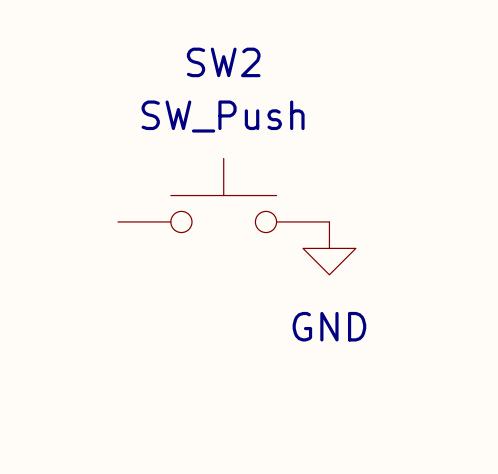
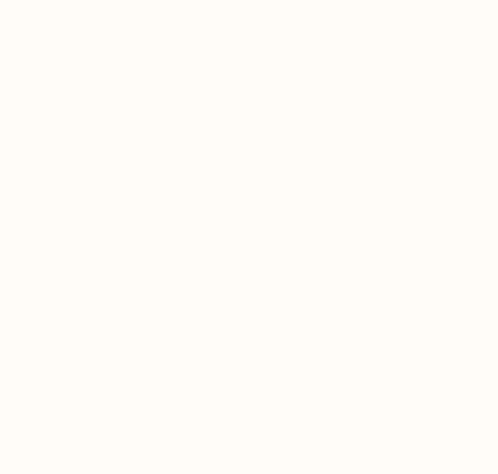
SW2: SW_Push (223, 195) -> none
power symbol: GND (329, 248) -> none

